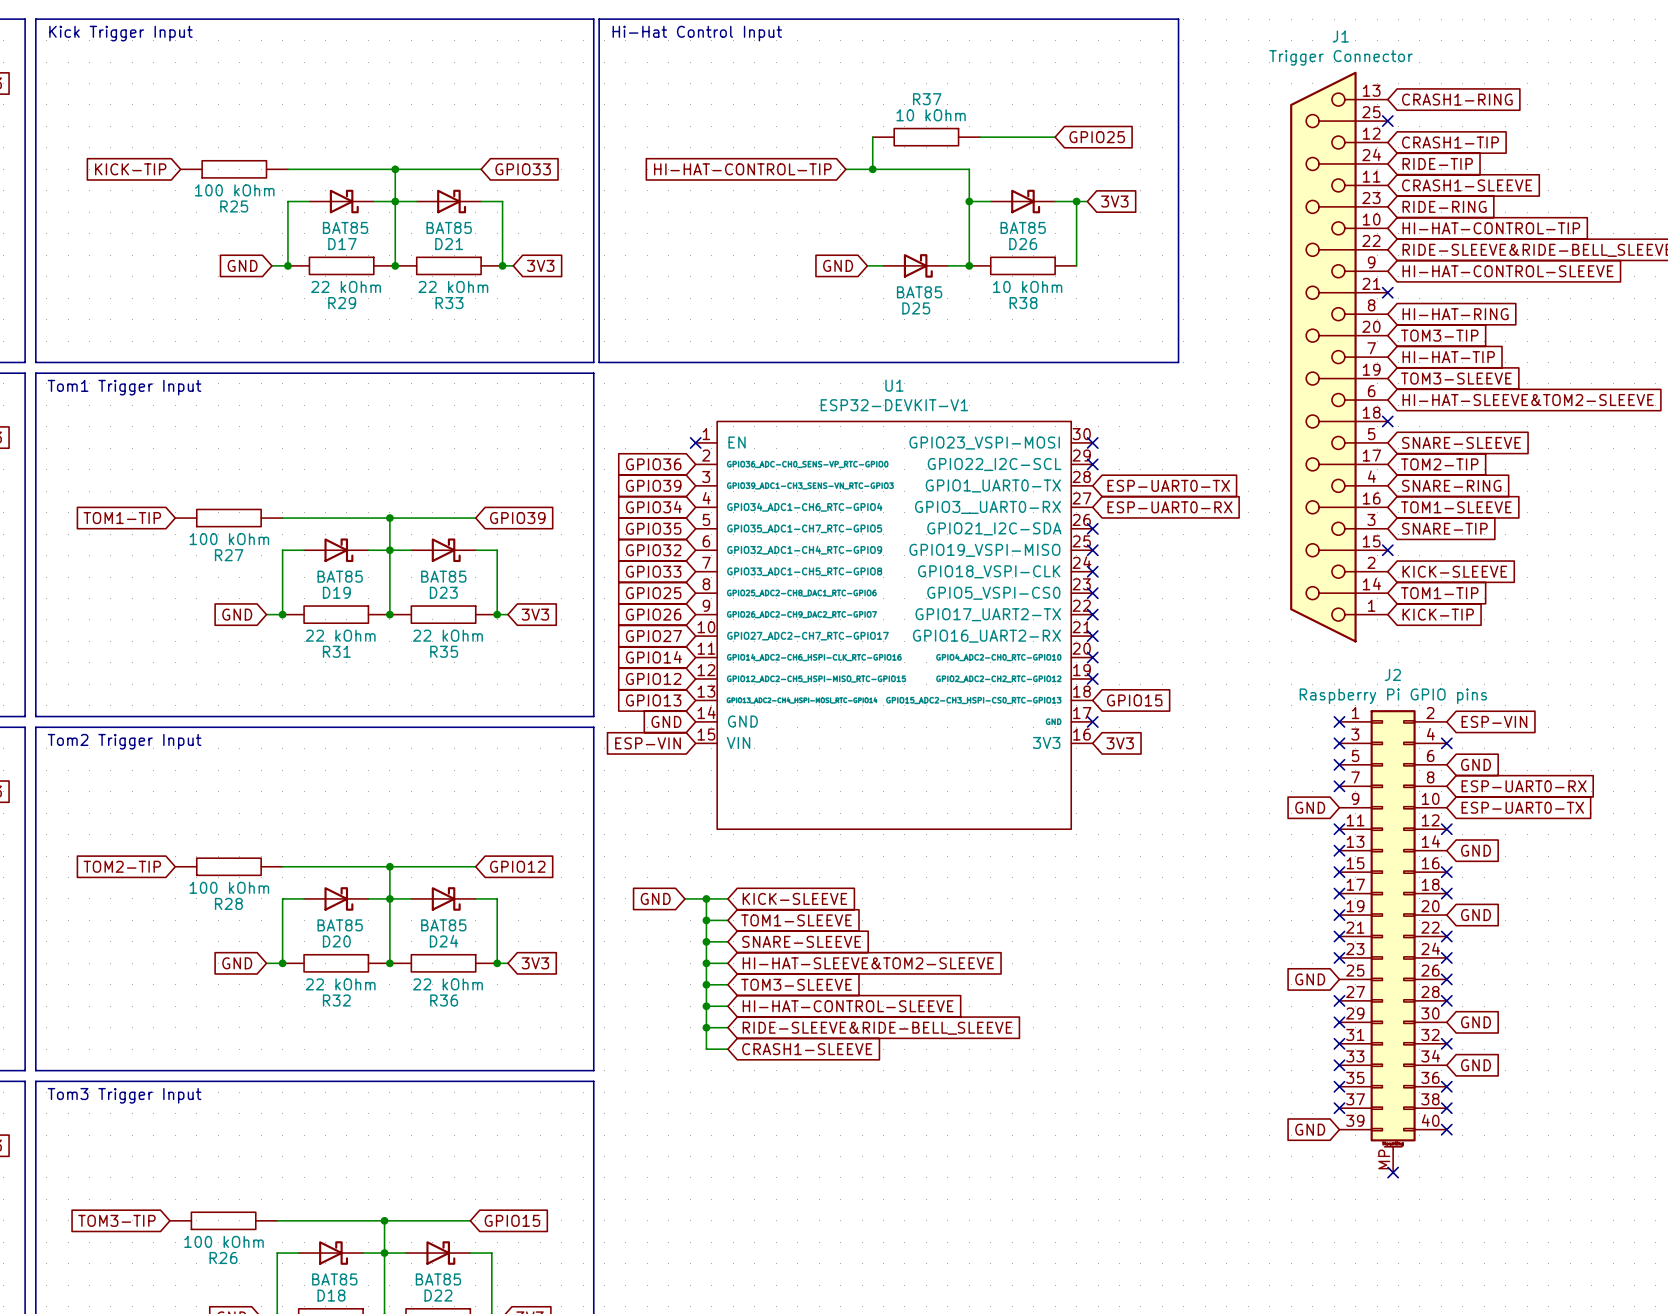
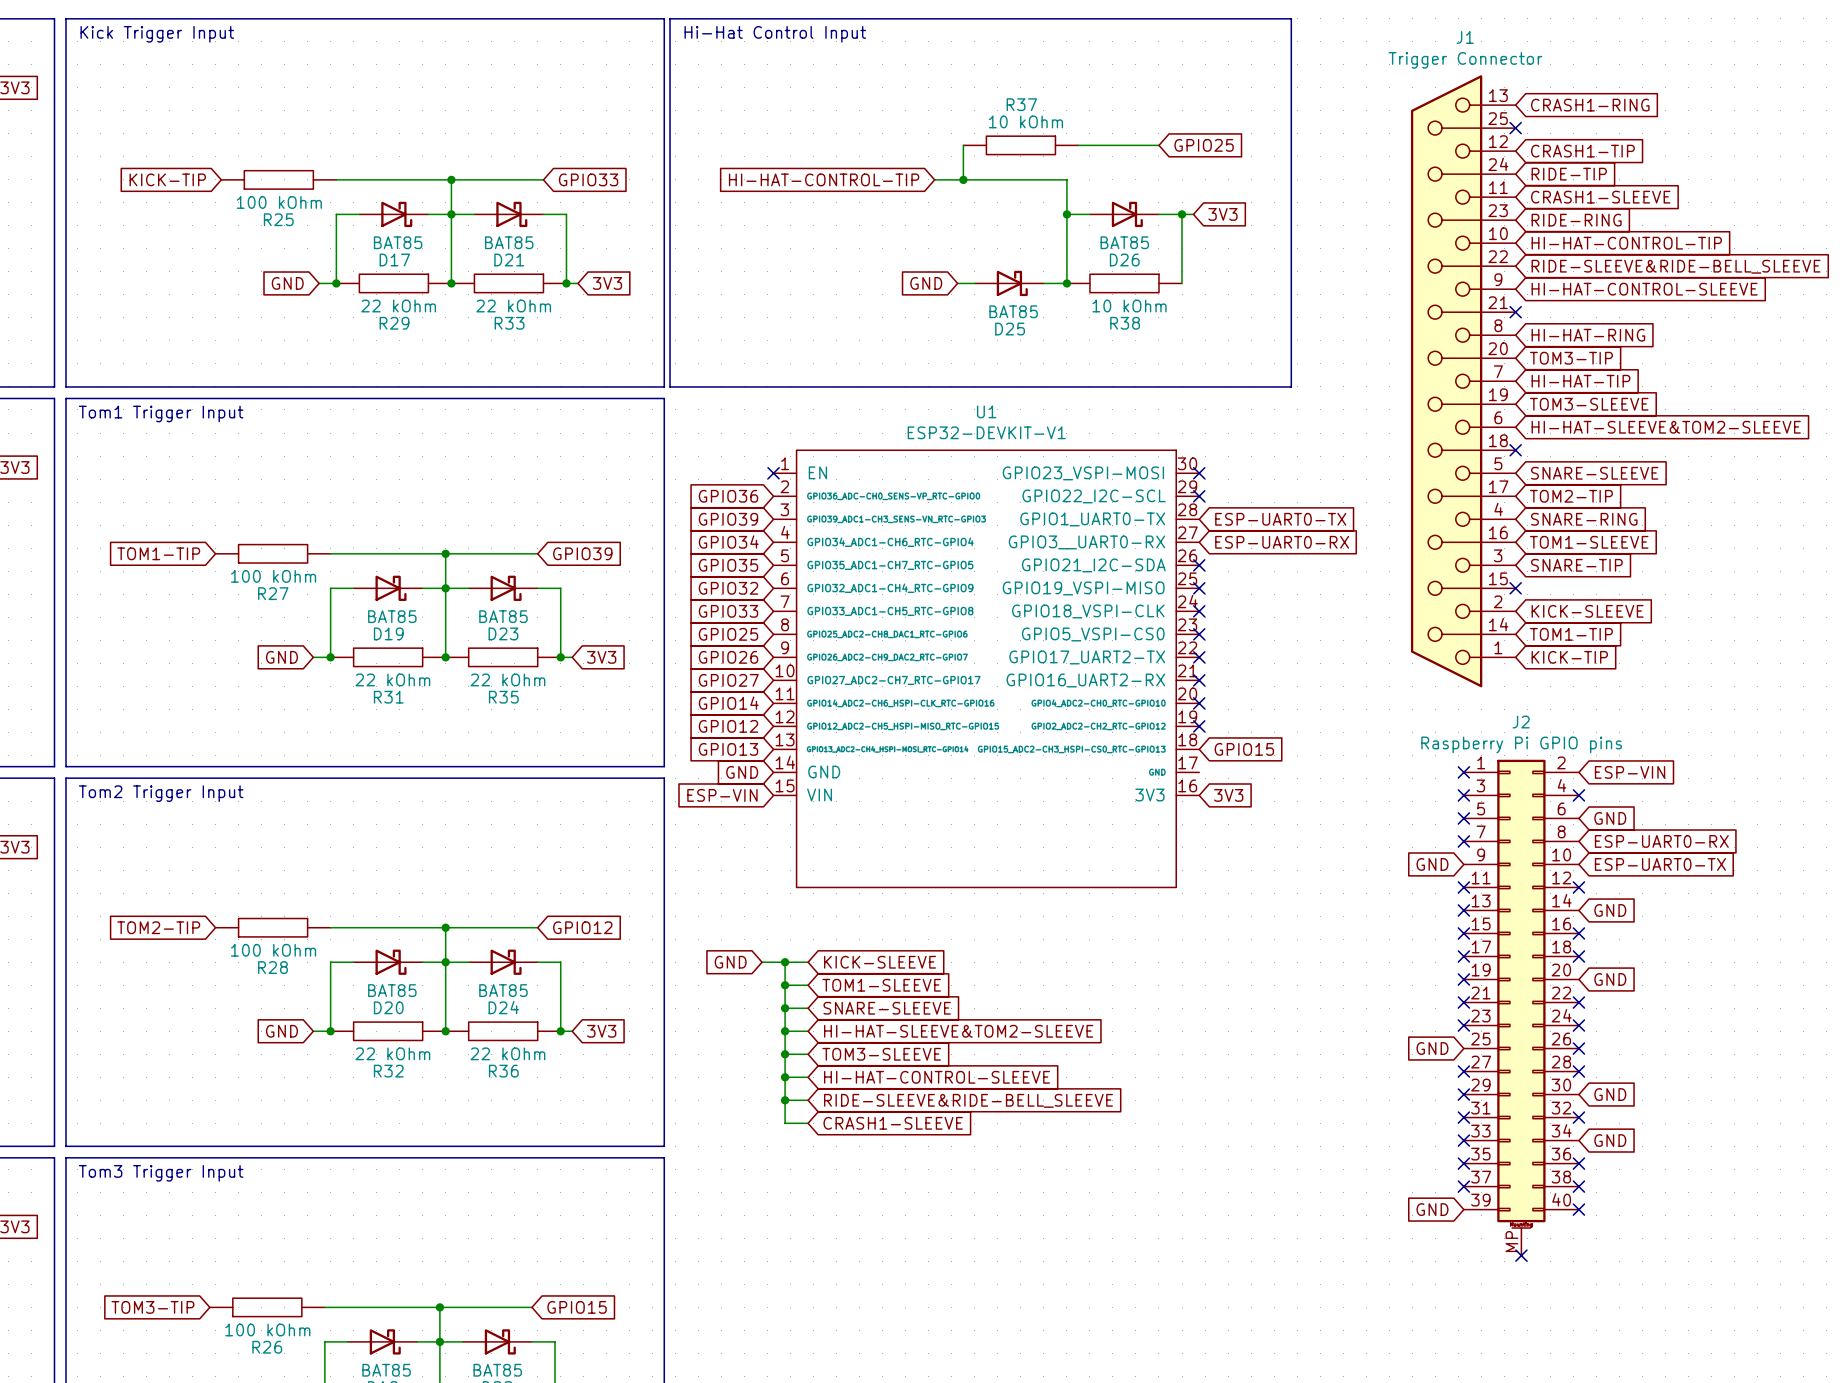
no-connect mark: (1092, 721) -> none

